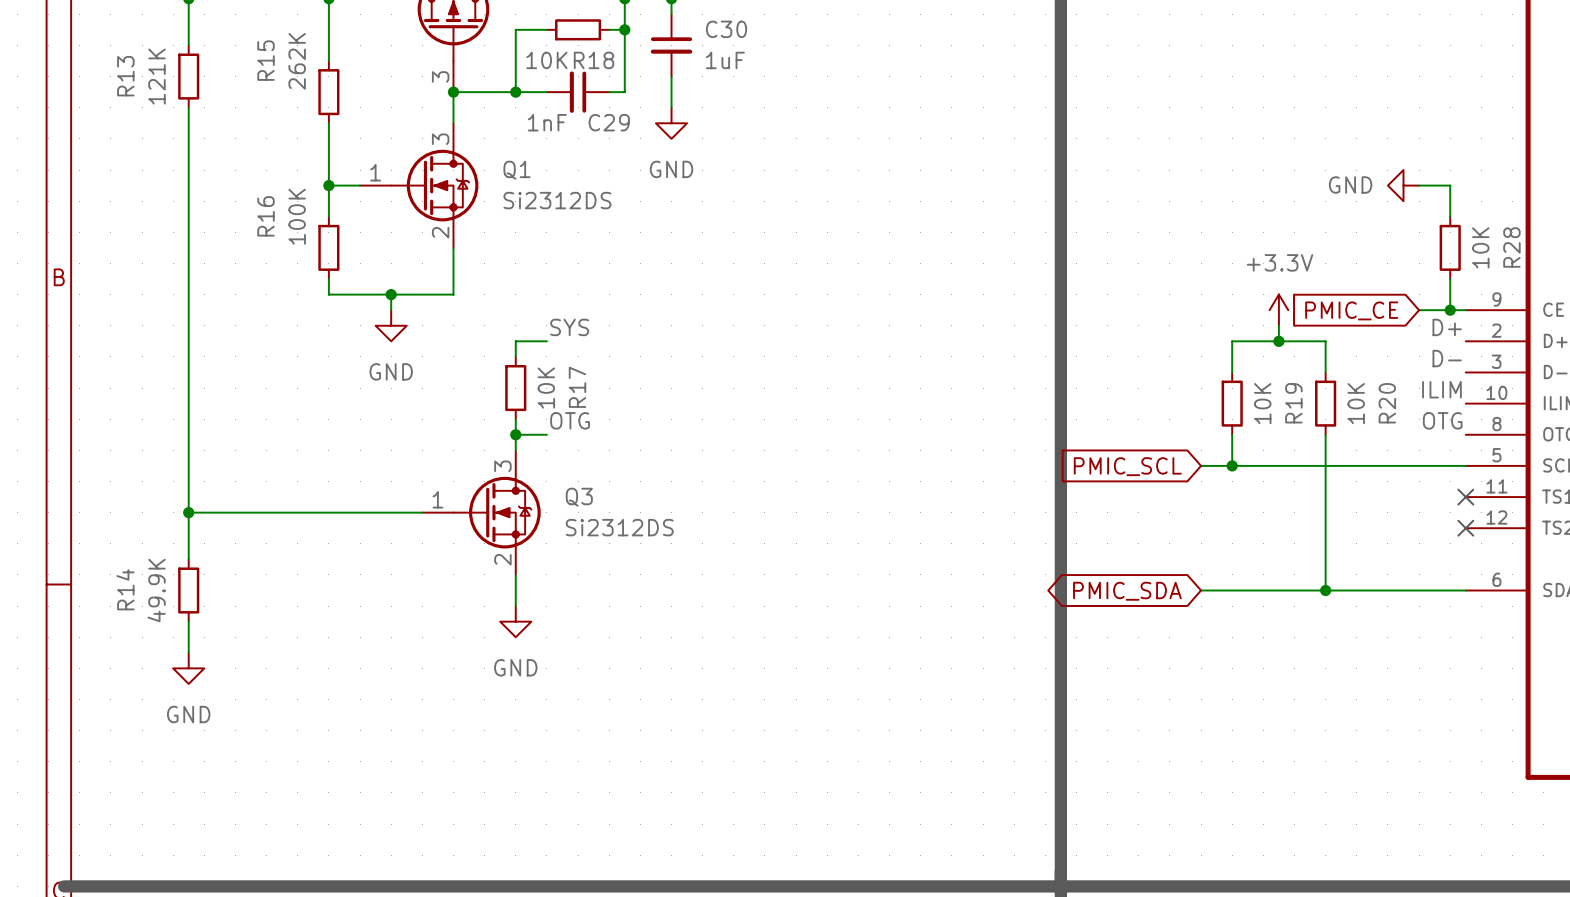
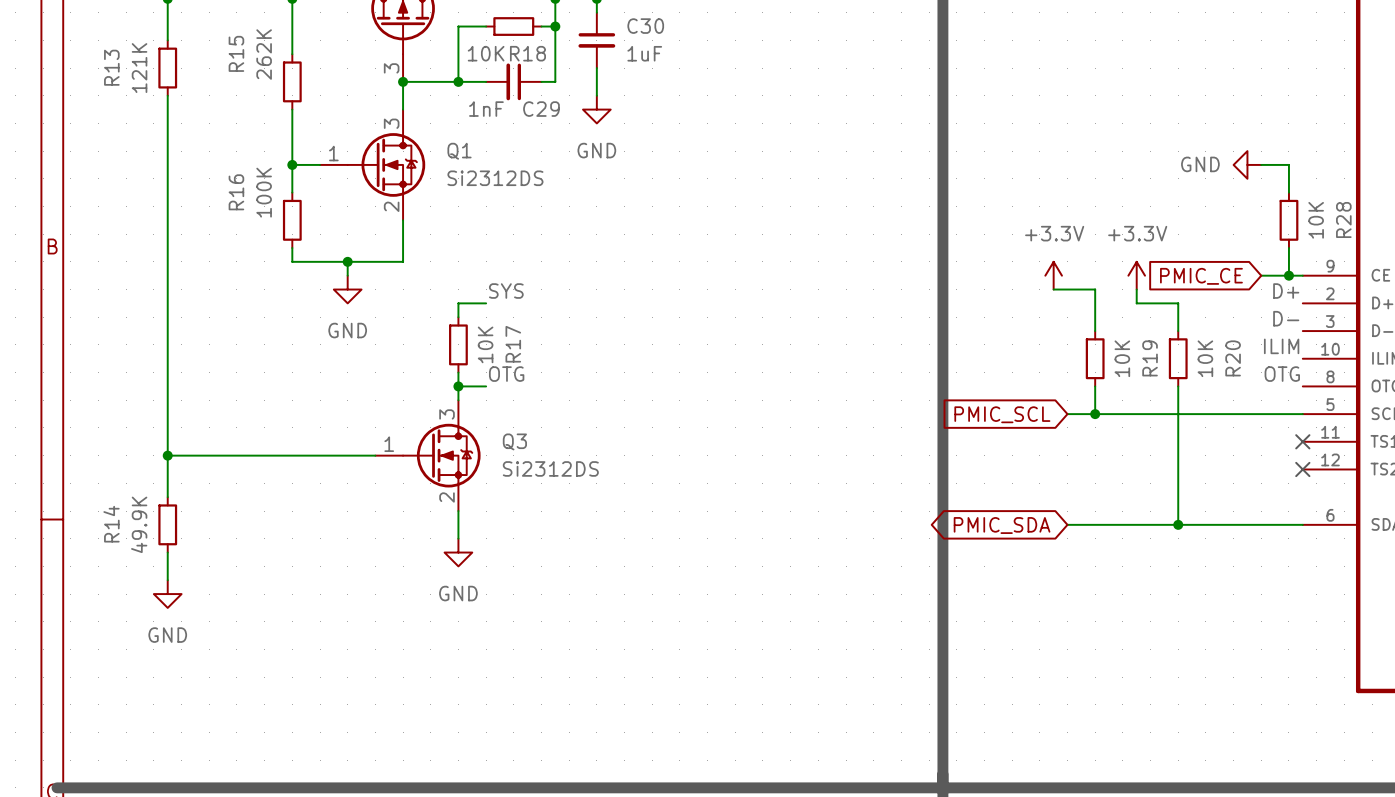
power symbol: none -> +3.3V (1053, 275)
wire: (1232, 341) (1278, 341) -> (1095, 303) (1095, 289) (1053, 289)
junction: (1278, 341) -> none

